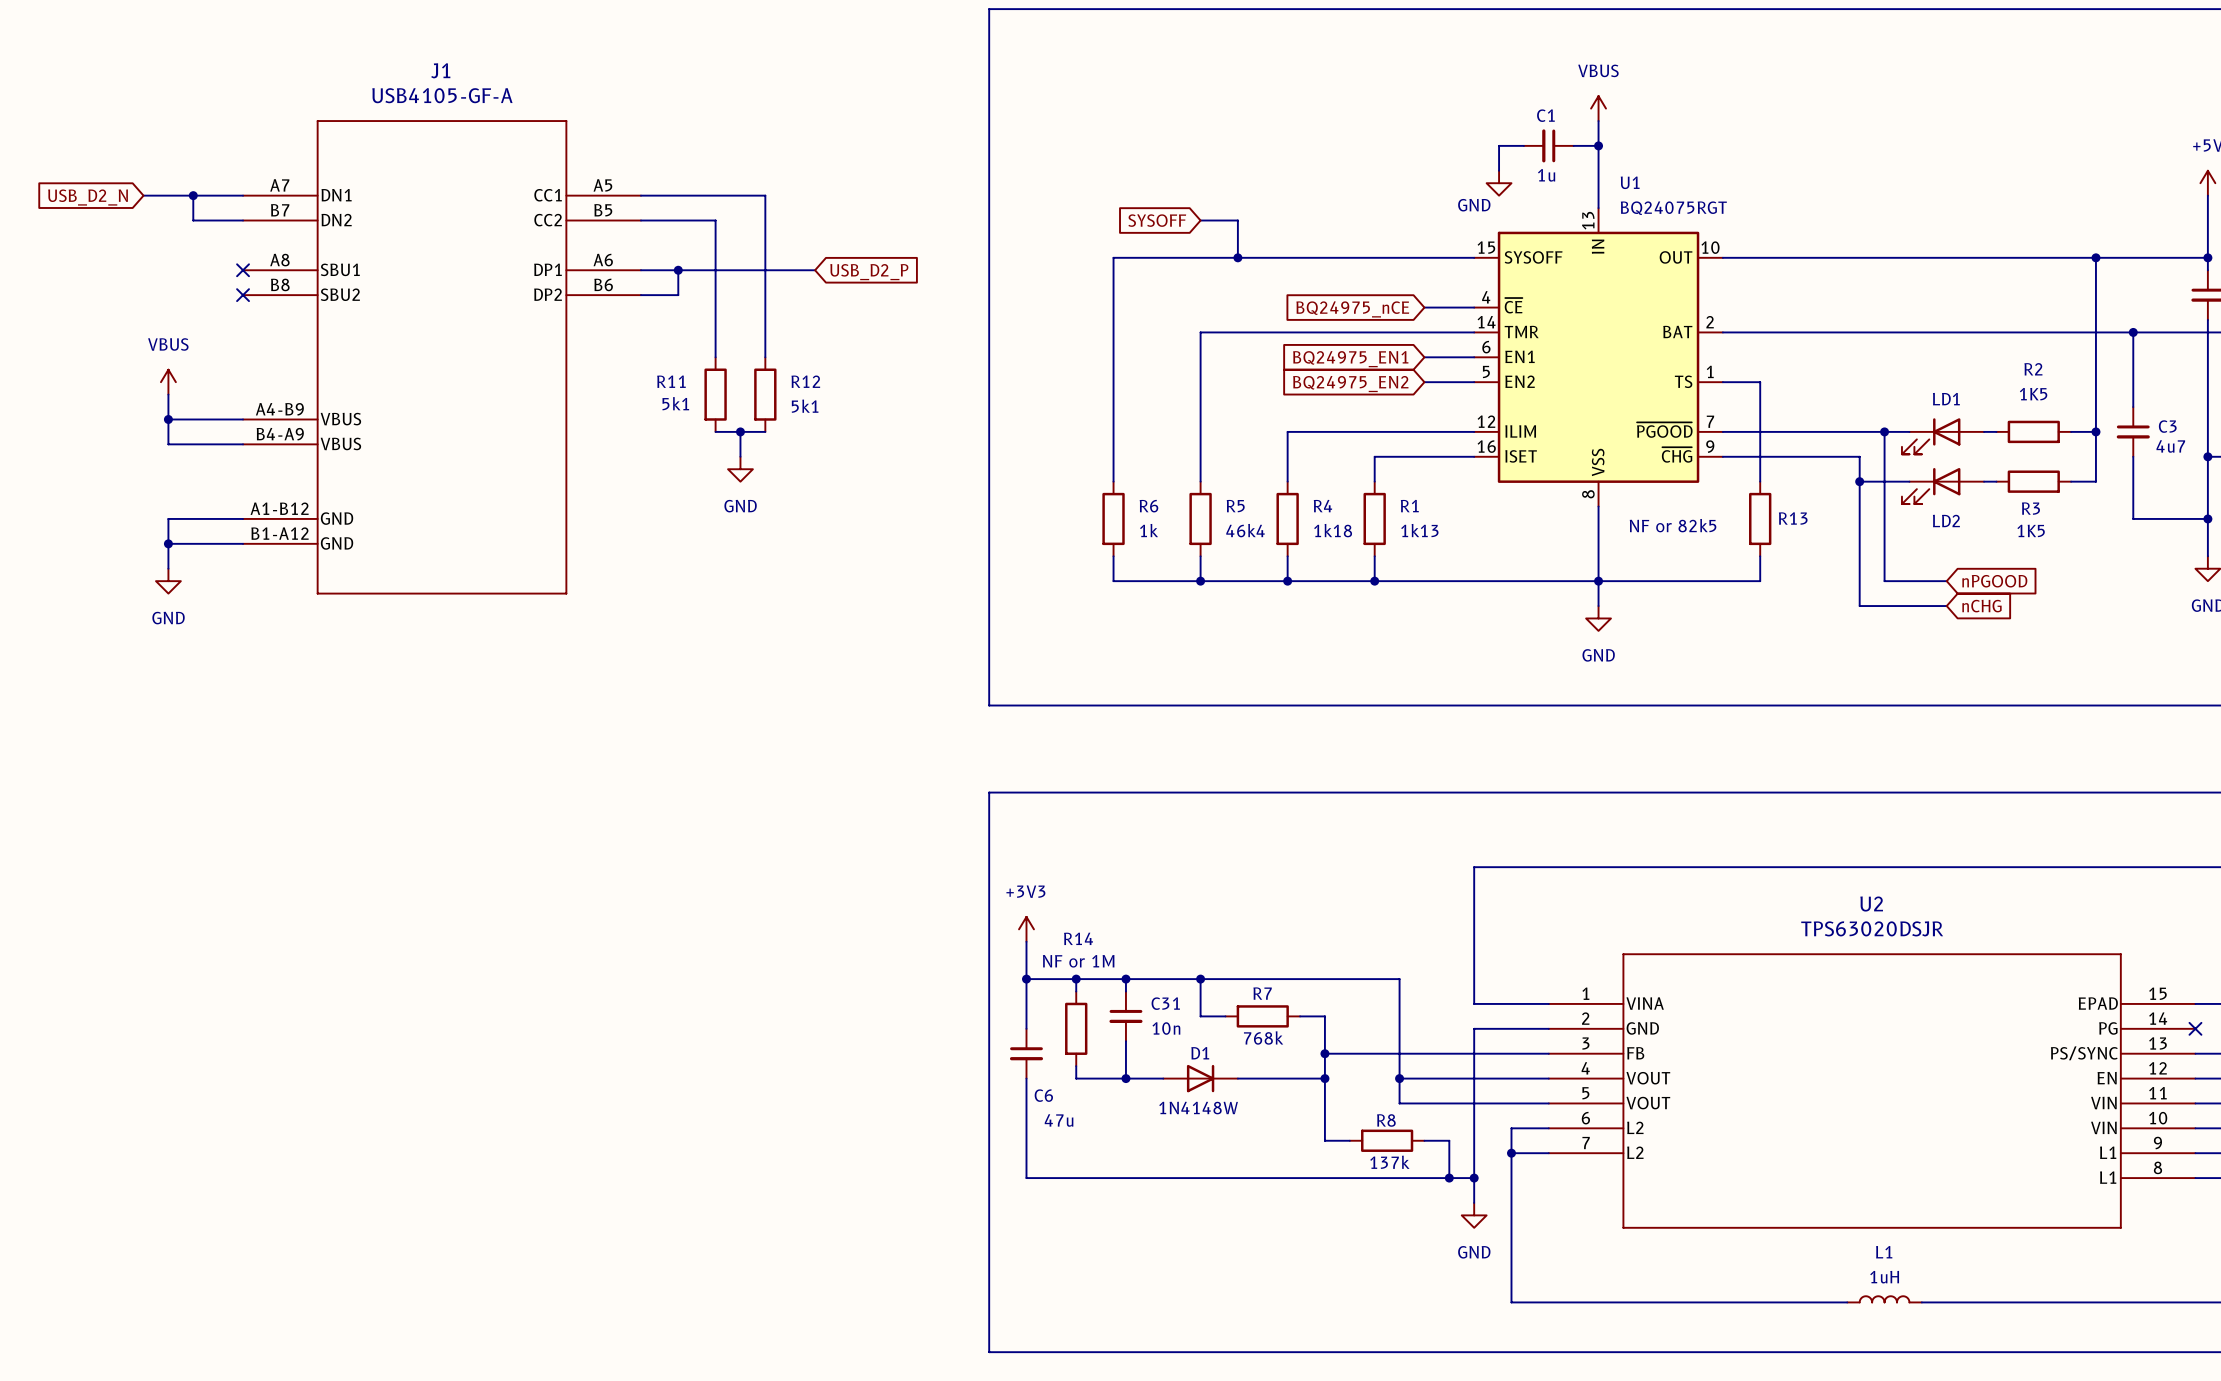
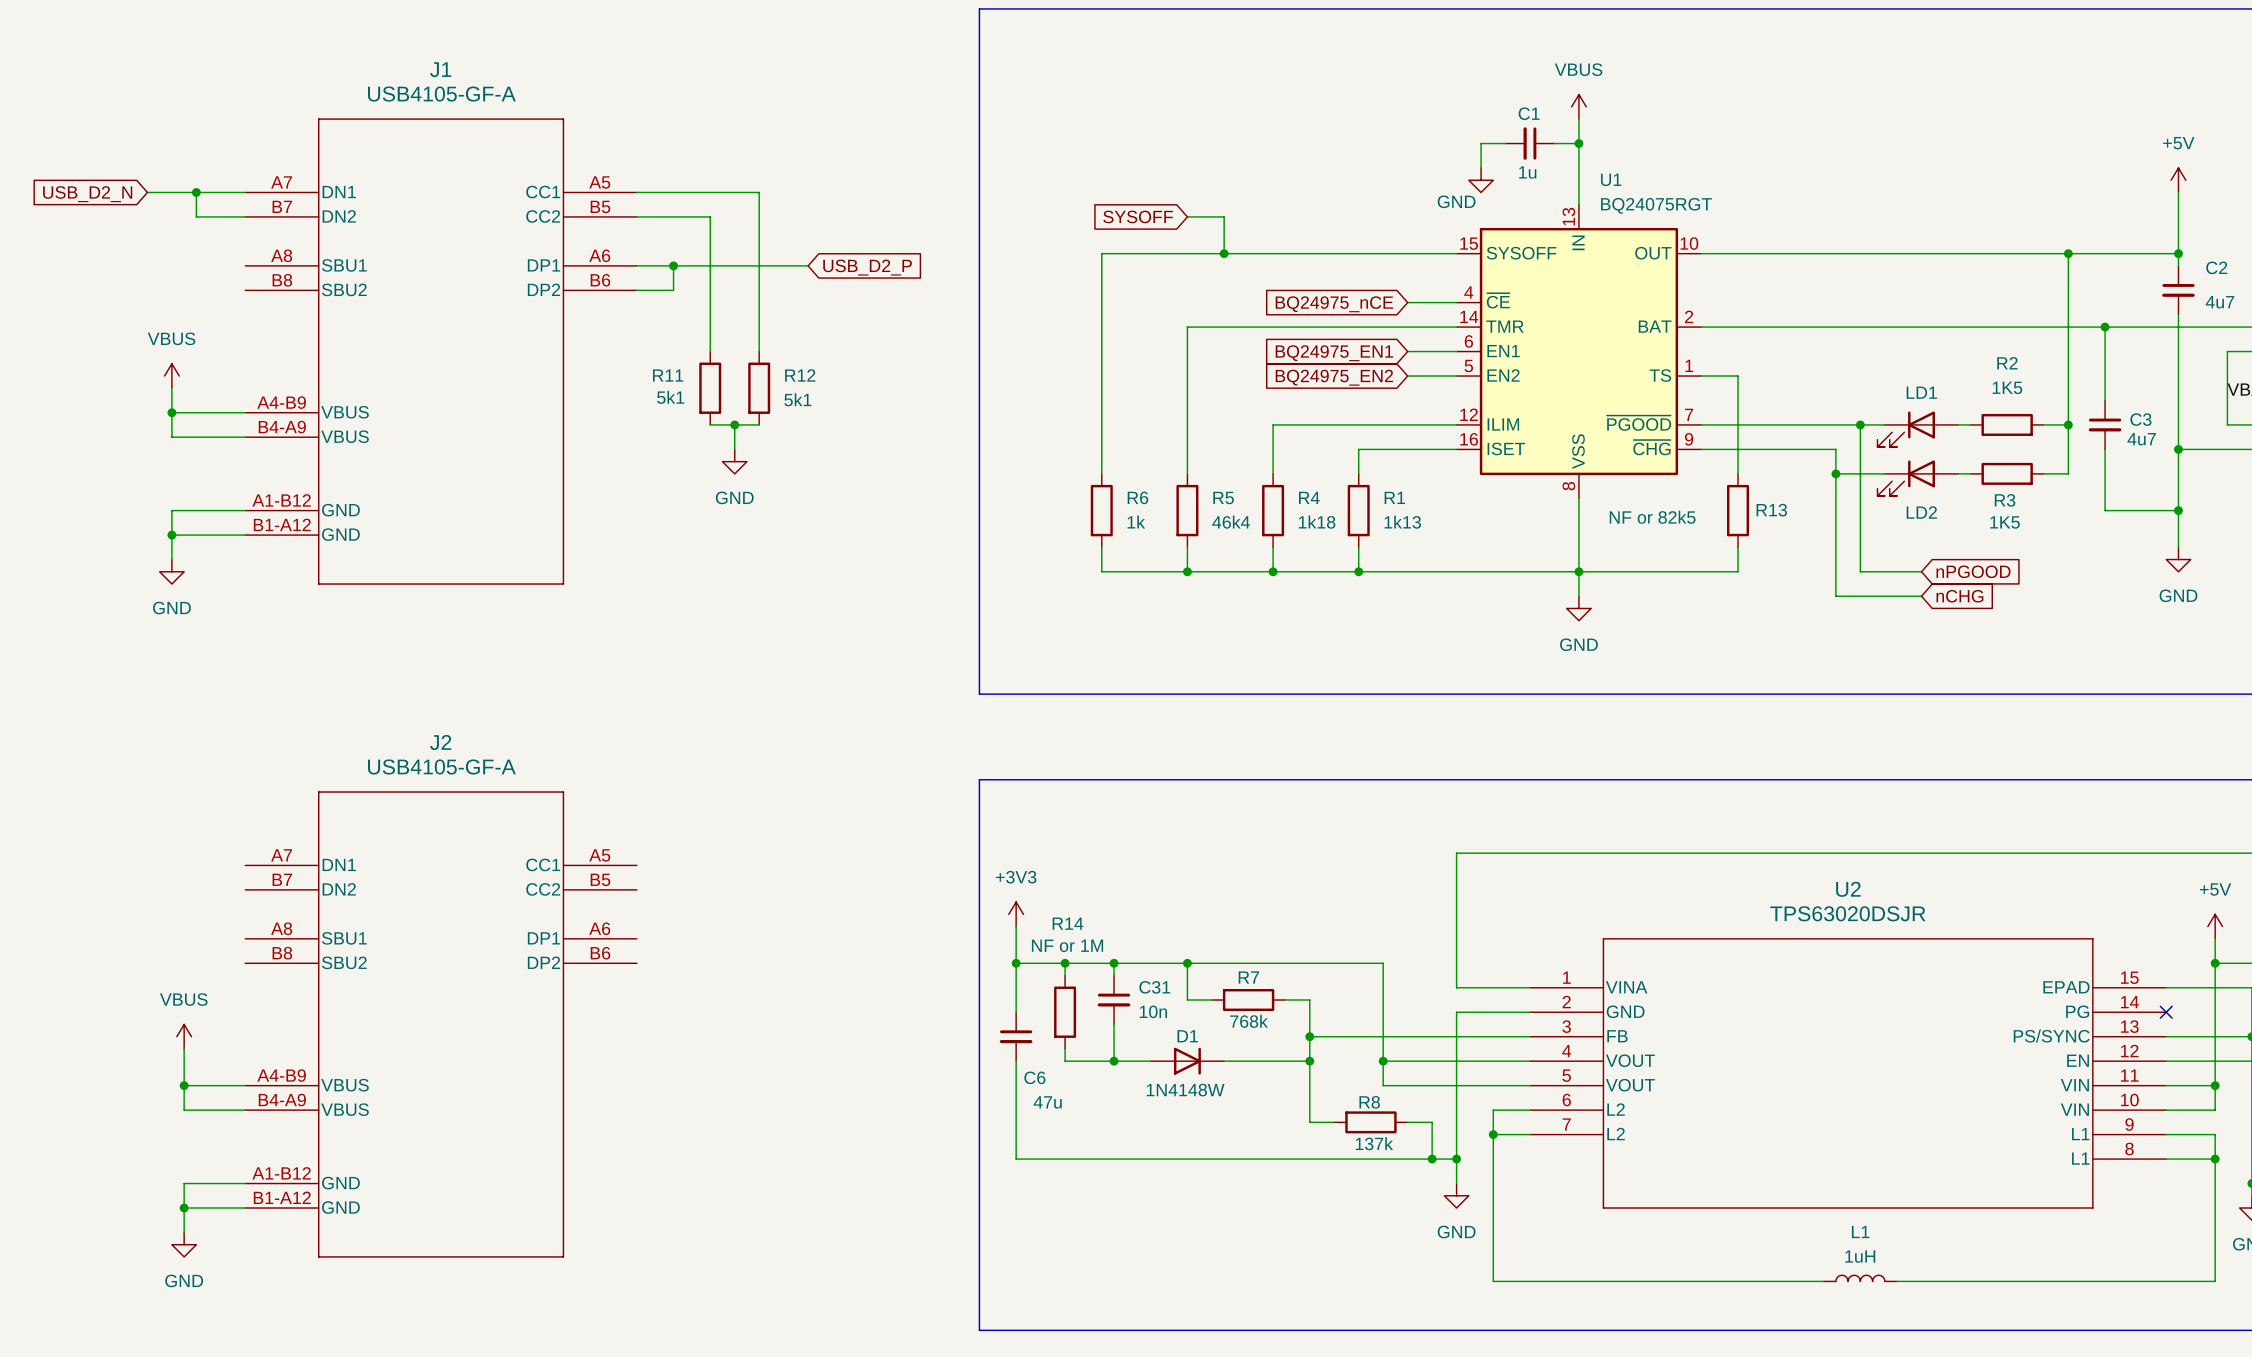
no-connect mark: (243, 270) -> none
no-connect mark: (243, 295) -> none
J2: none -> USB4105-GF-A (441, 1024)
power symbol: none -> VBUS (184, 1036)
wire: none -> (184, 1048) (184, 1110) (245, 1110)
wire: none -> (184, 1085) (245, 1085)
junction: none -> (184, 1085)
wire: none -> (245, 1183) (184, 1183) (184, 1232)
wire: none -> (184, 1208) (245, 1208)
junction: none -> (184, 1208)
power symbol: none -> GND (184, 1244)

